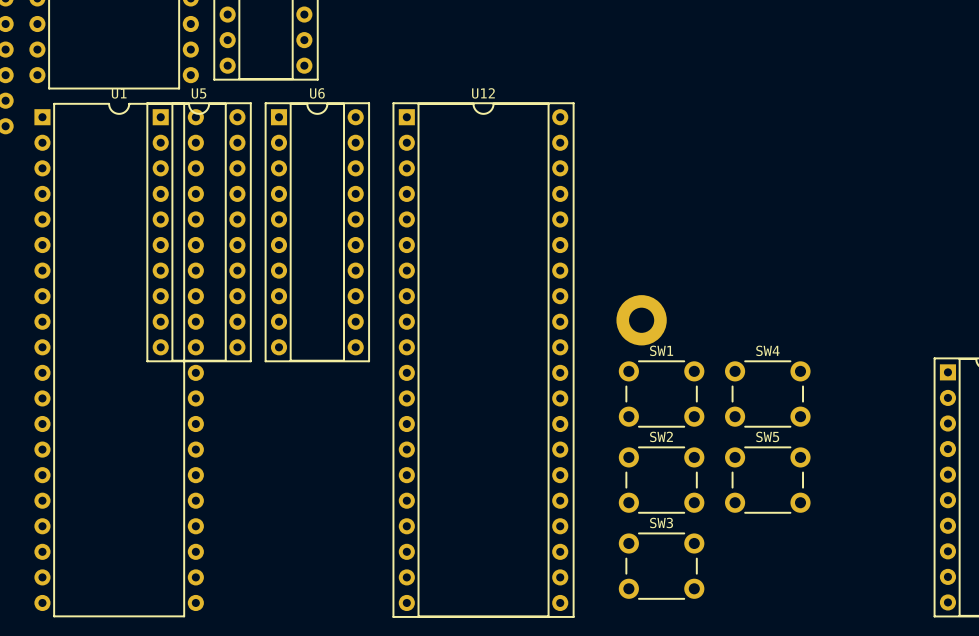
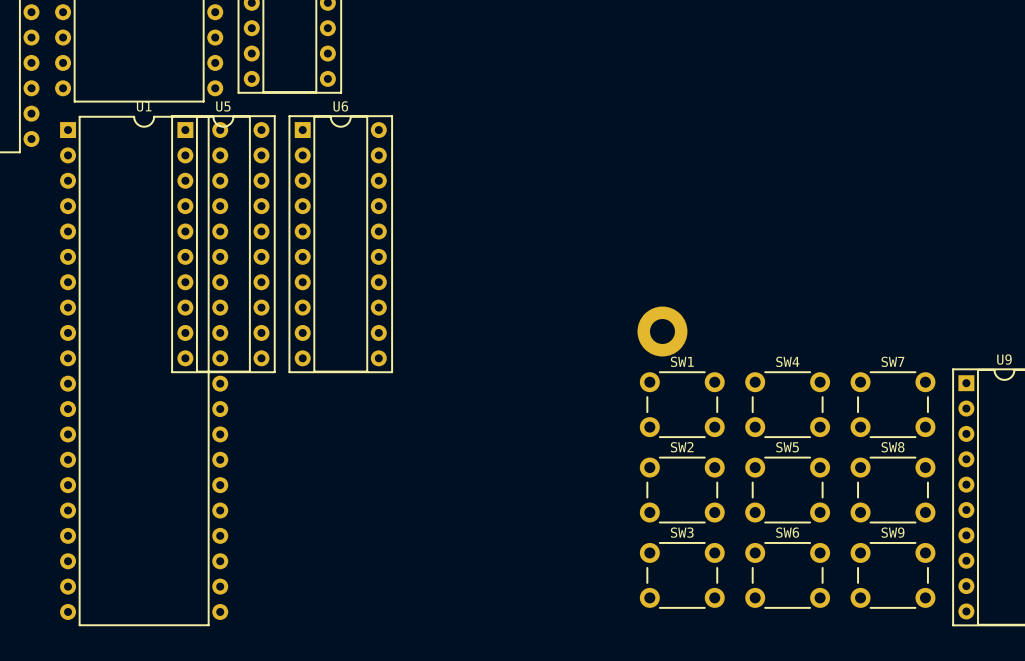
U12: (483, 360) -> none
SW7: none -> (893, 404)
SW8: none -> (893, 490)
SW6: none -> (787, 575)
SW9: none -> (893, 575)

